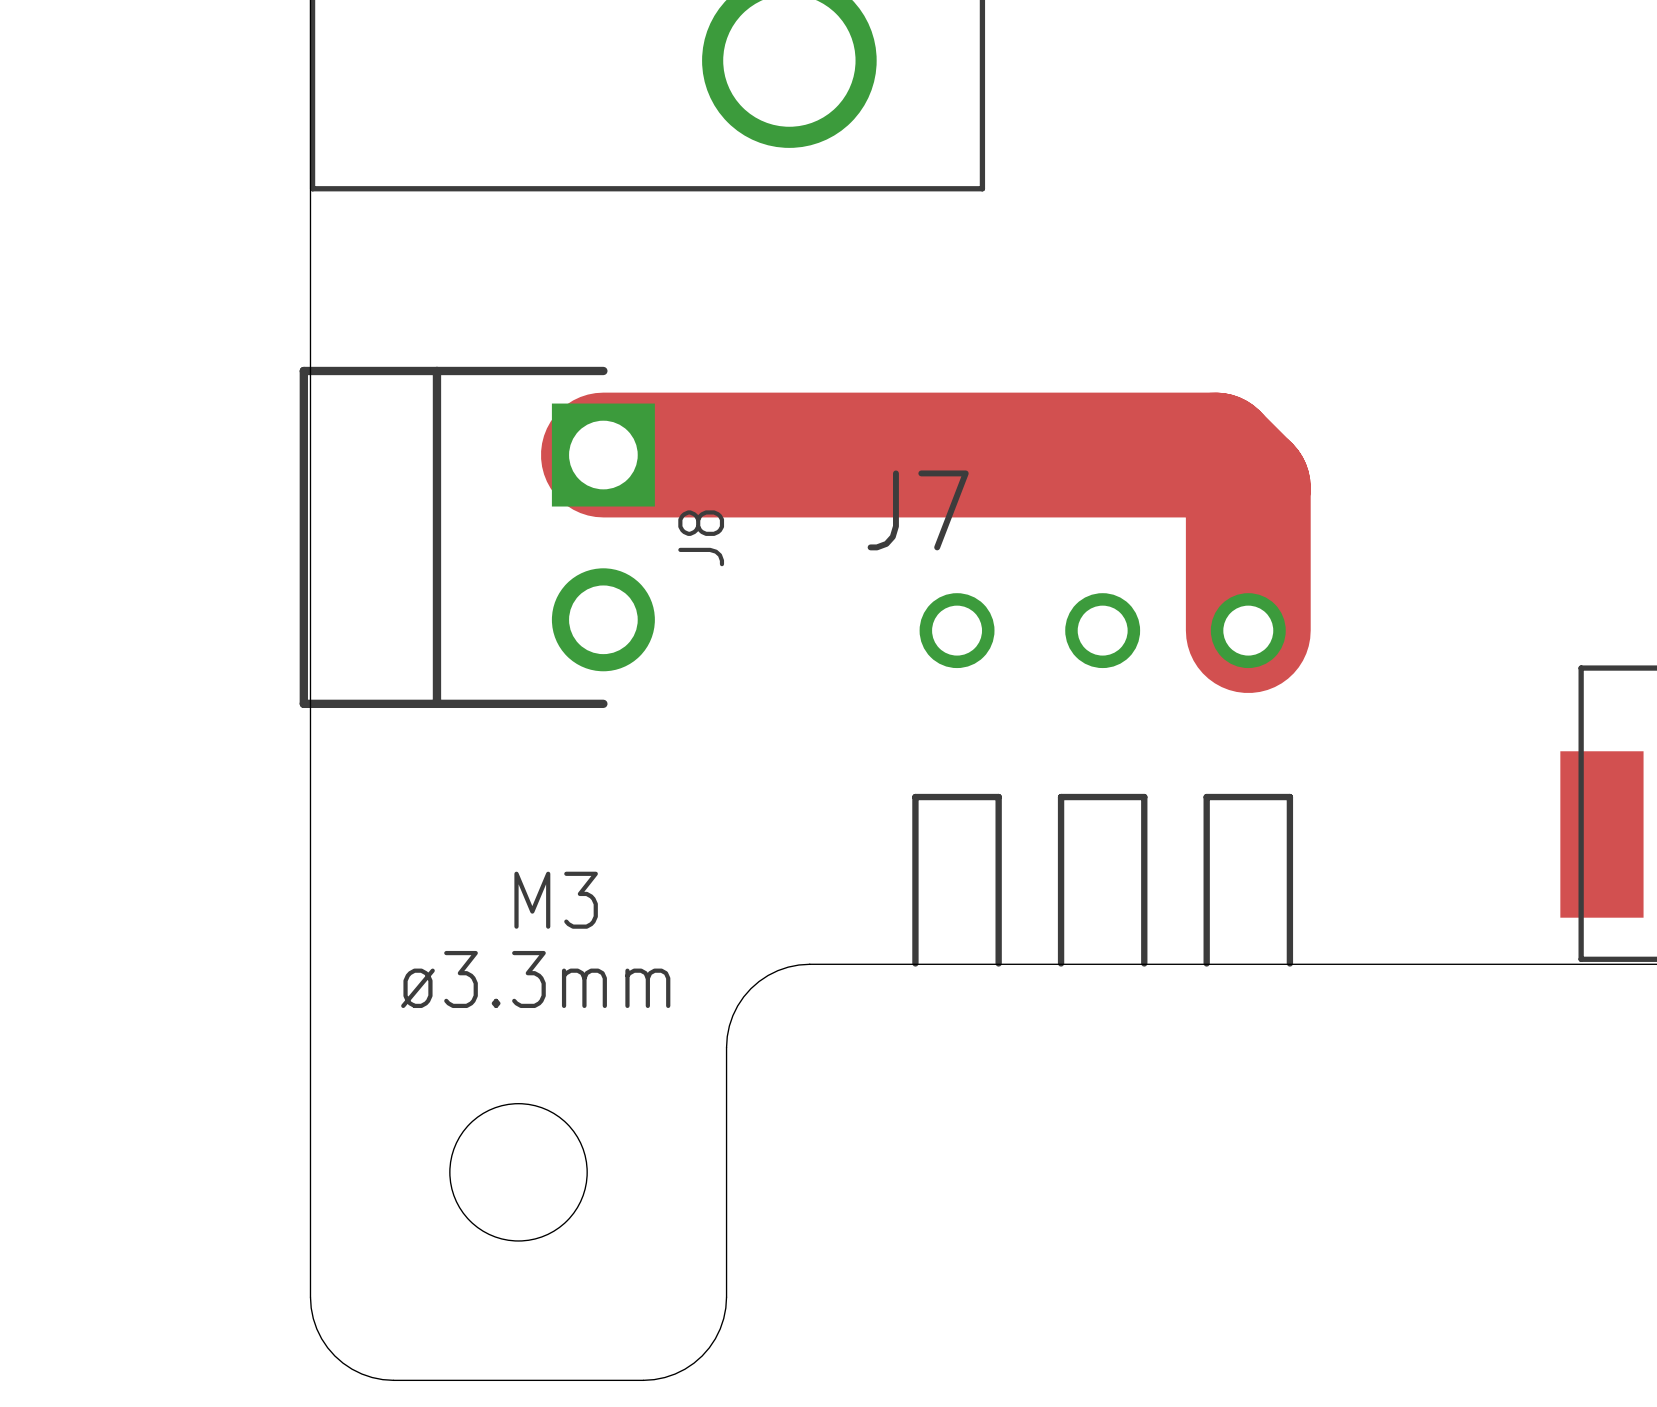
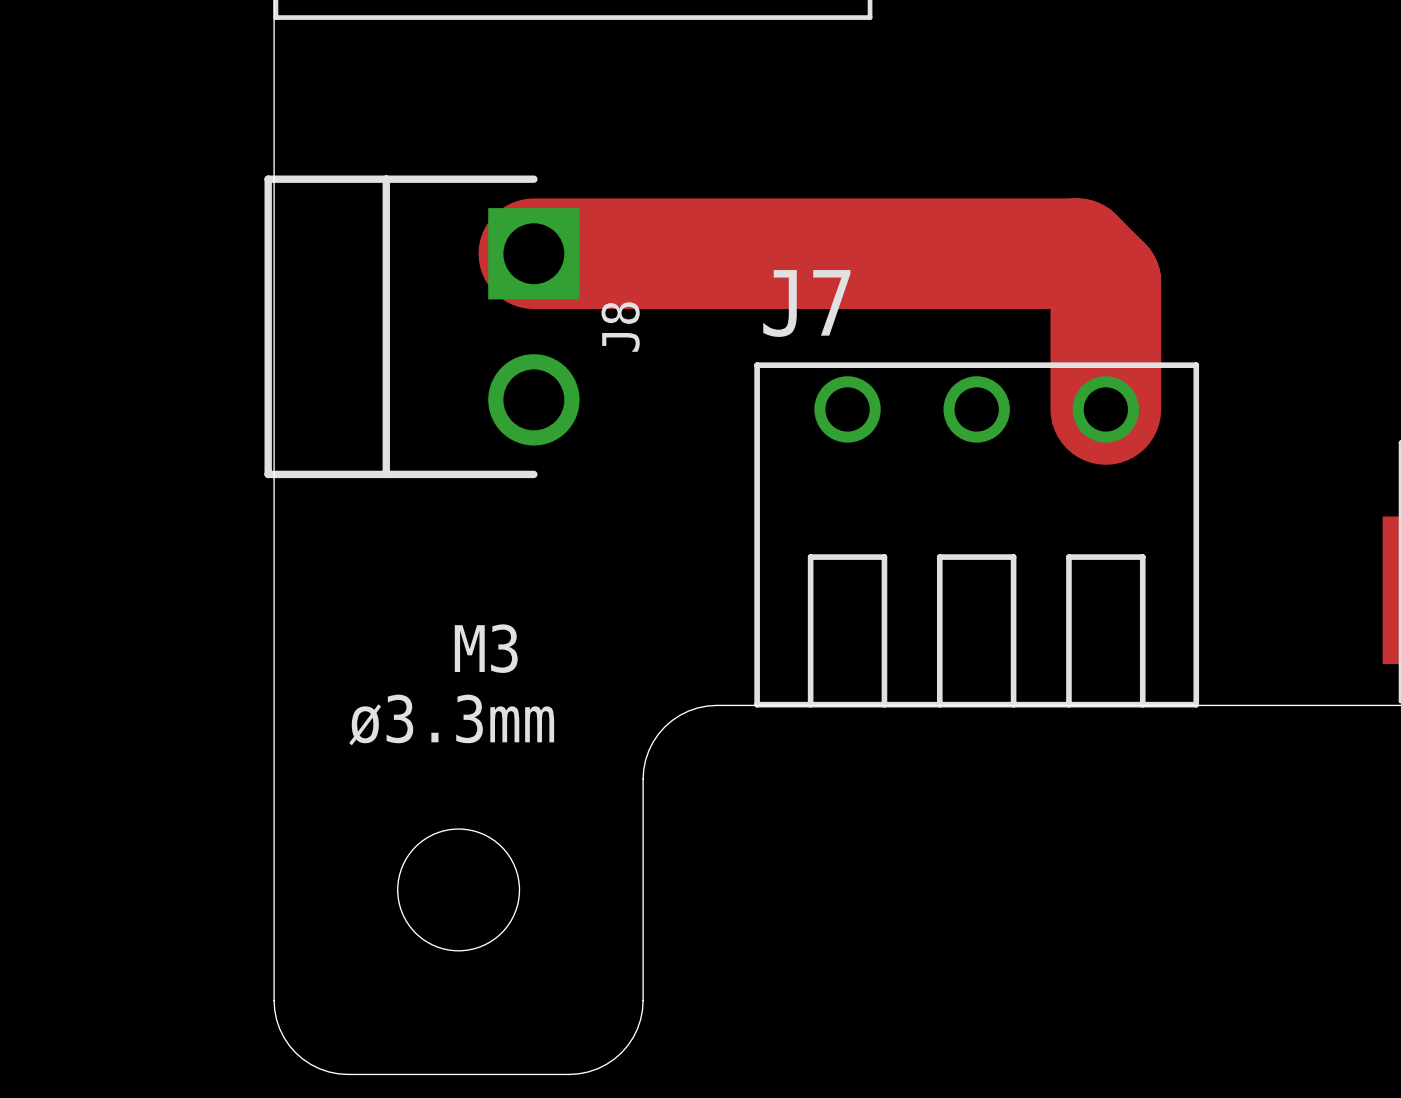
J7 footprint: [912, 593, 1294, 967] -> [754, 362, 1200, 708]

